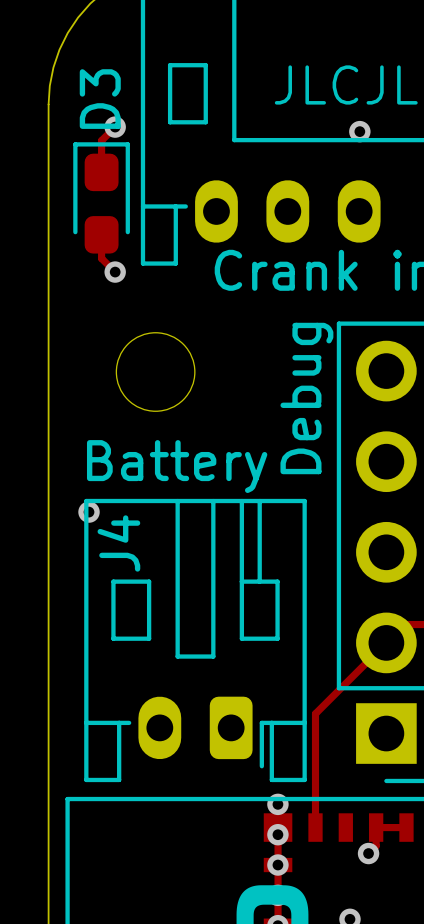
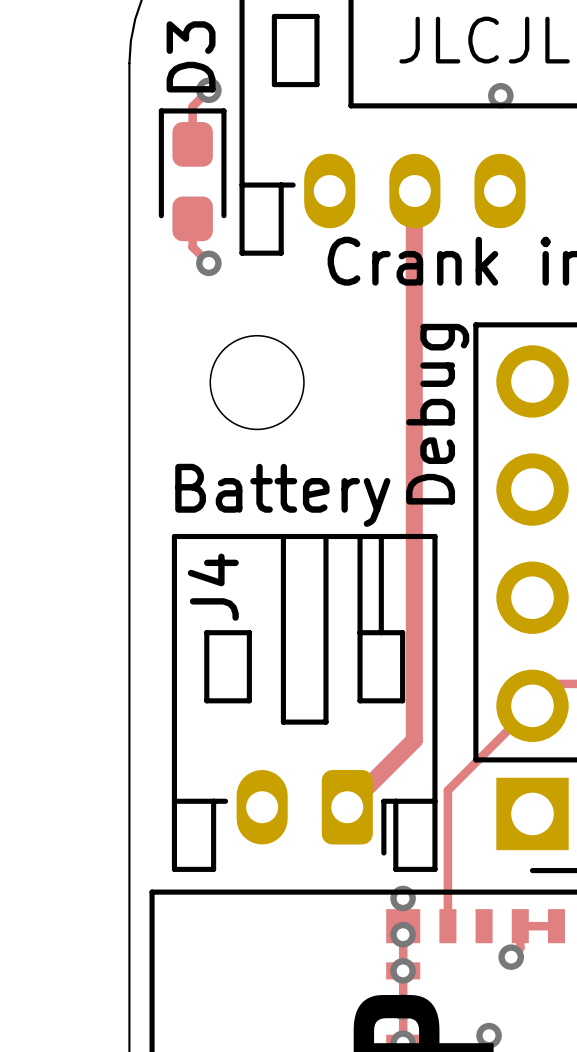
track: none -> (414, 191) (414, 740) (347, 807)
via: (89, 512) -> none

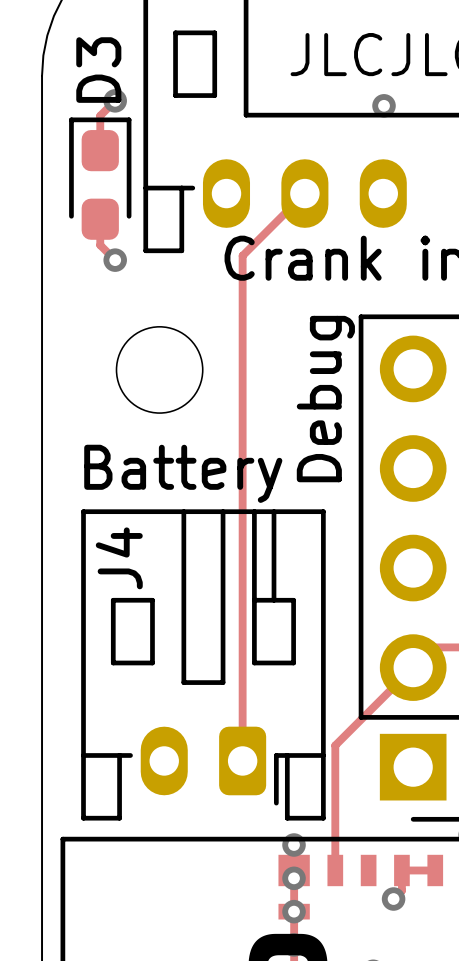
track: (414, 191) (414, 740) (347, 807) -> (304, 194) (242, 255) (242, 760)

